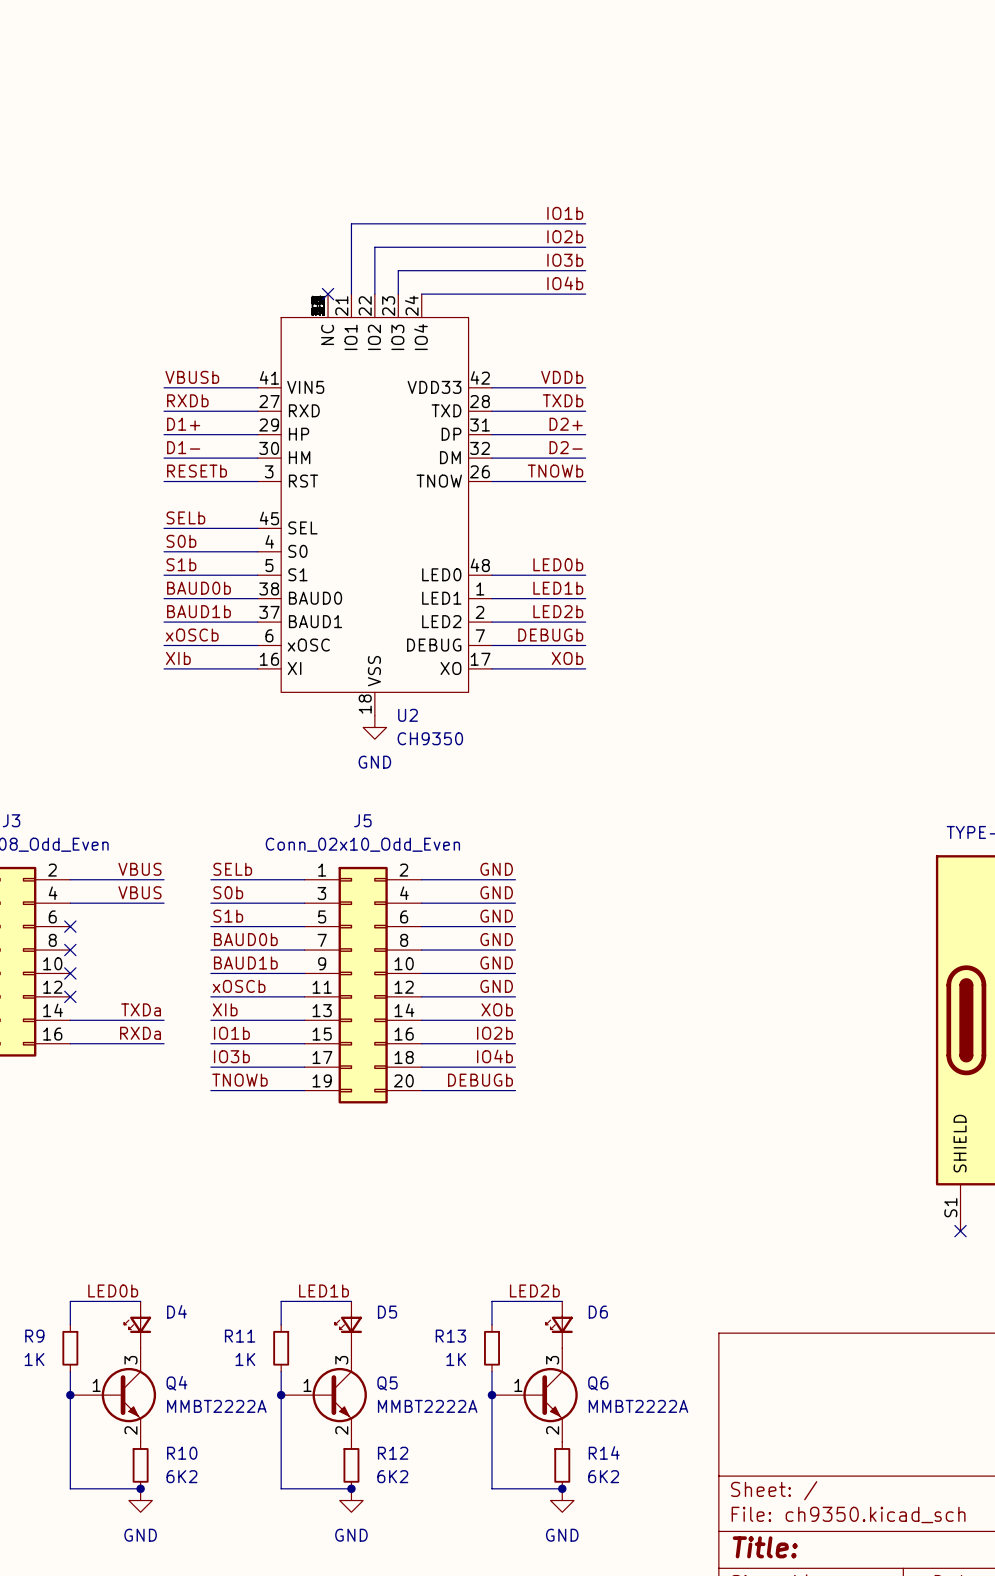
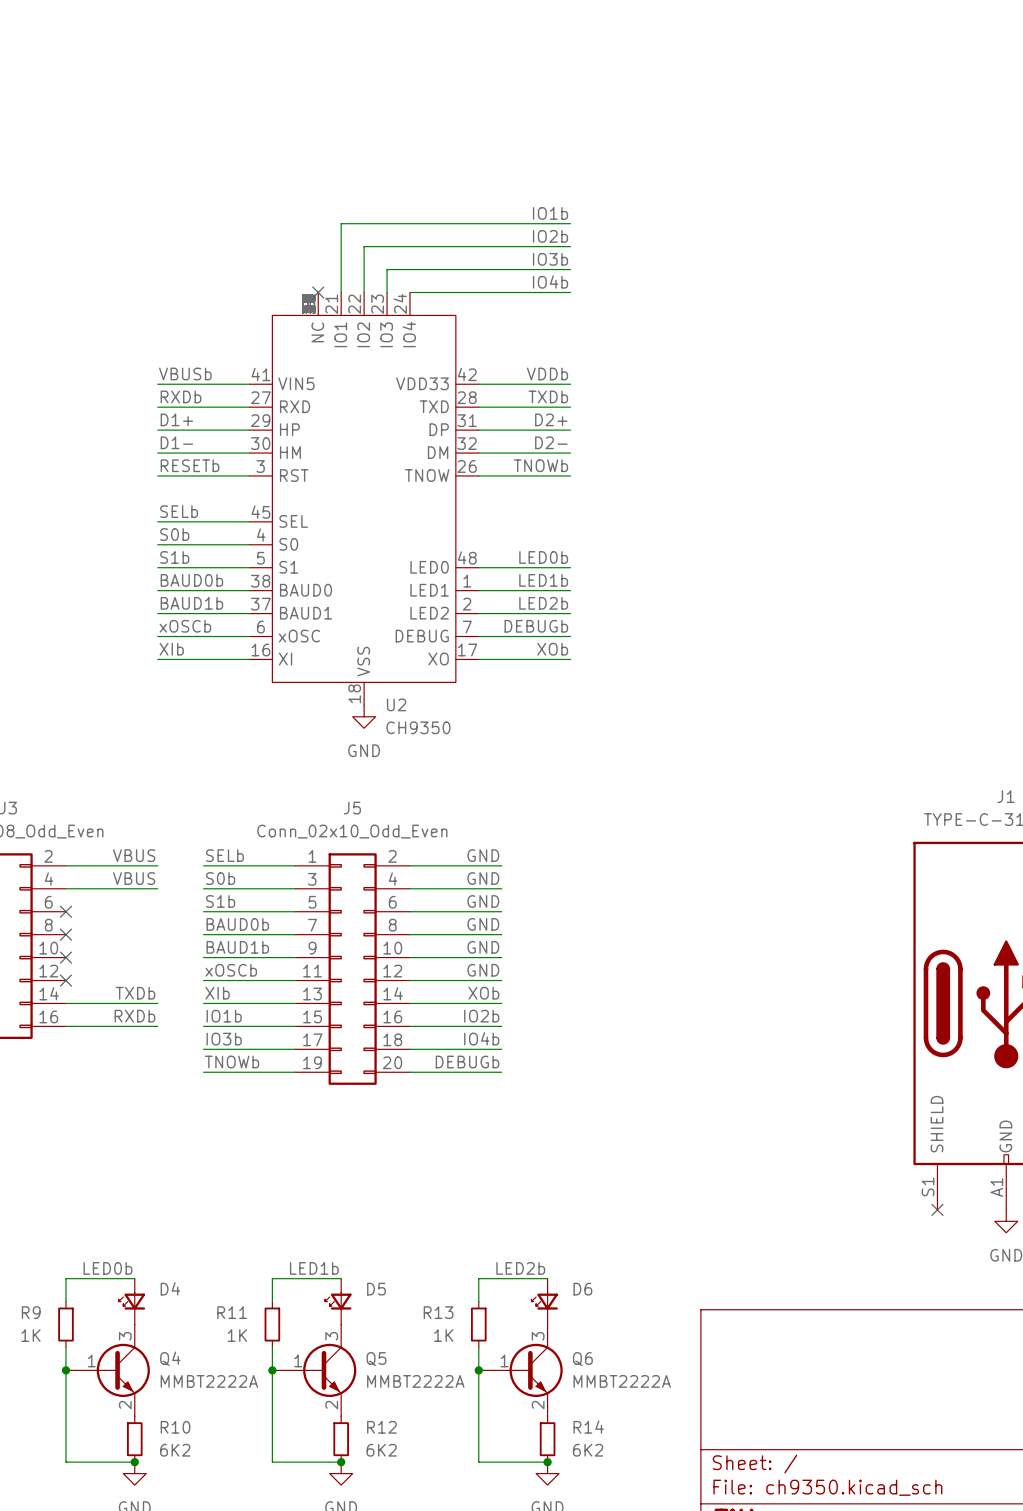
label: TXDa (141, 1009) -> TXDb (135, 993)
label: RXDa (140, 1033) -> RXDb (134, 1016)

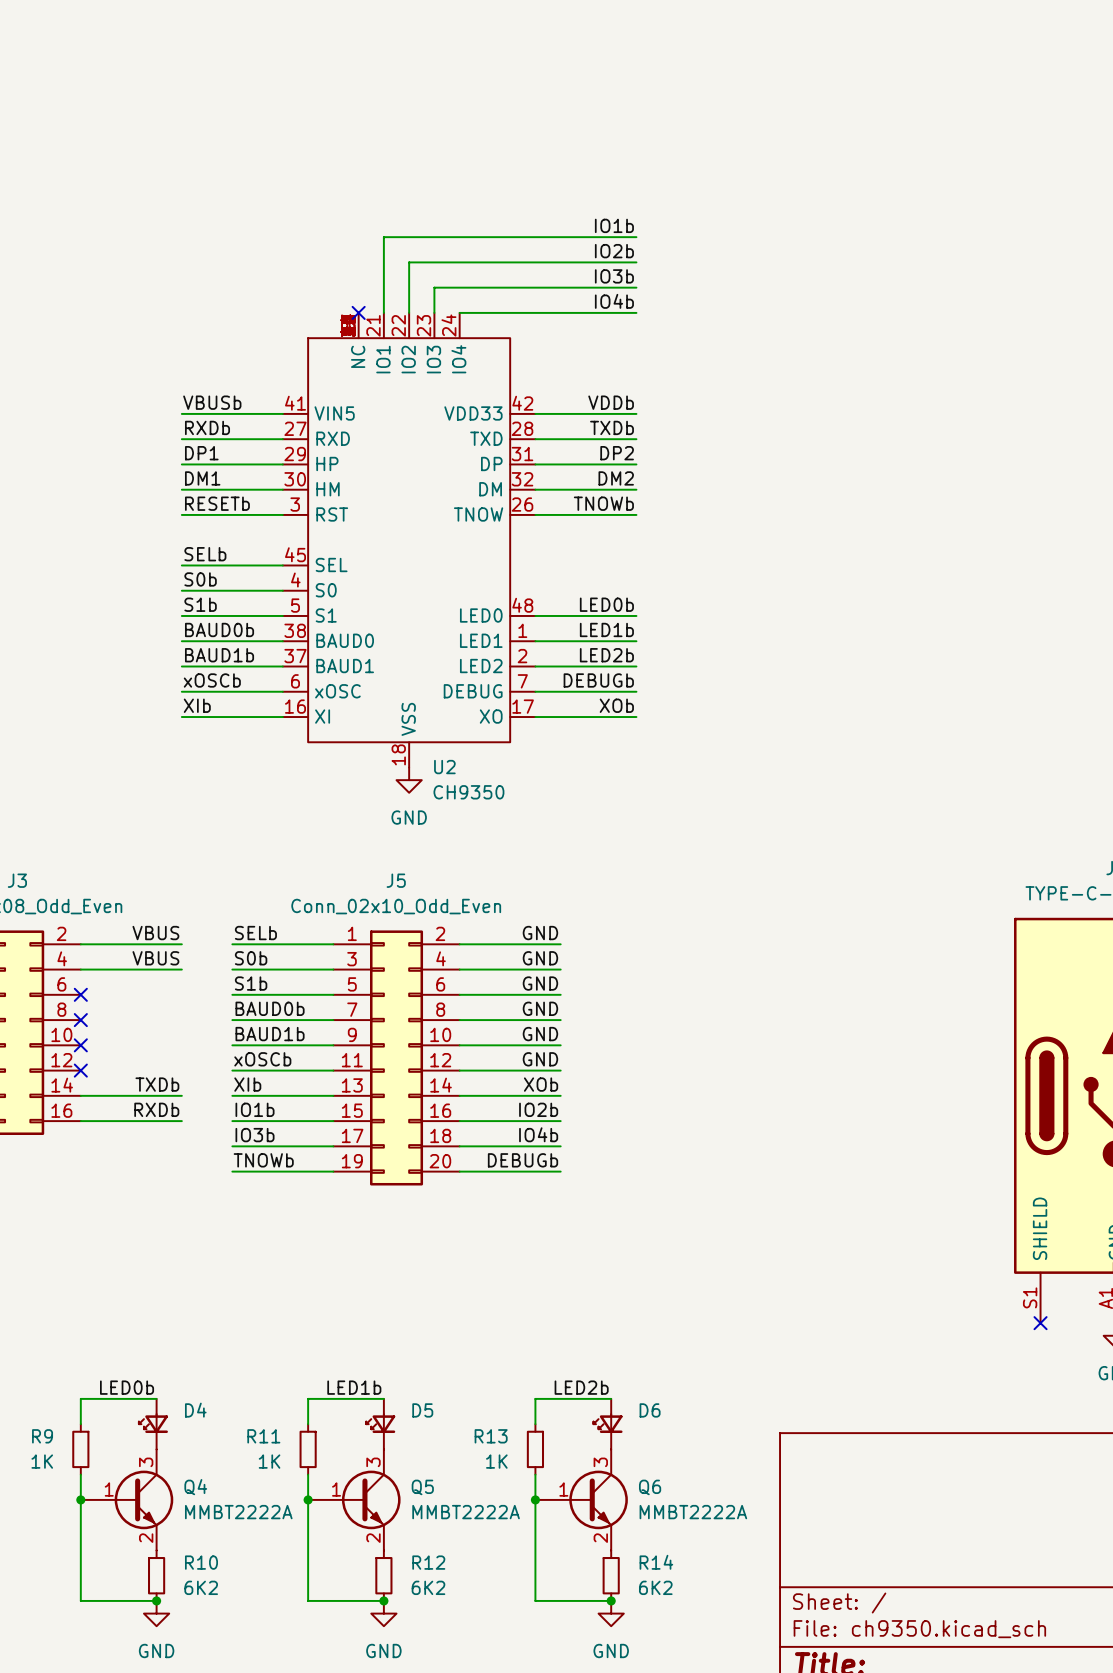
label: D1+ (176, 419) -> DP1 (201, 453)
label: D2+ (551, 419) -> DP2 (617, 453)
label: D1- (176, 442) -> DM1 (202, 478)
label: D2- (551, 442) -> DM2 (616, 478)

